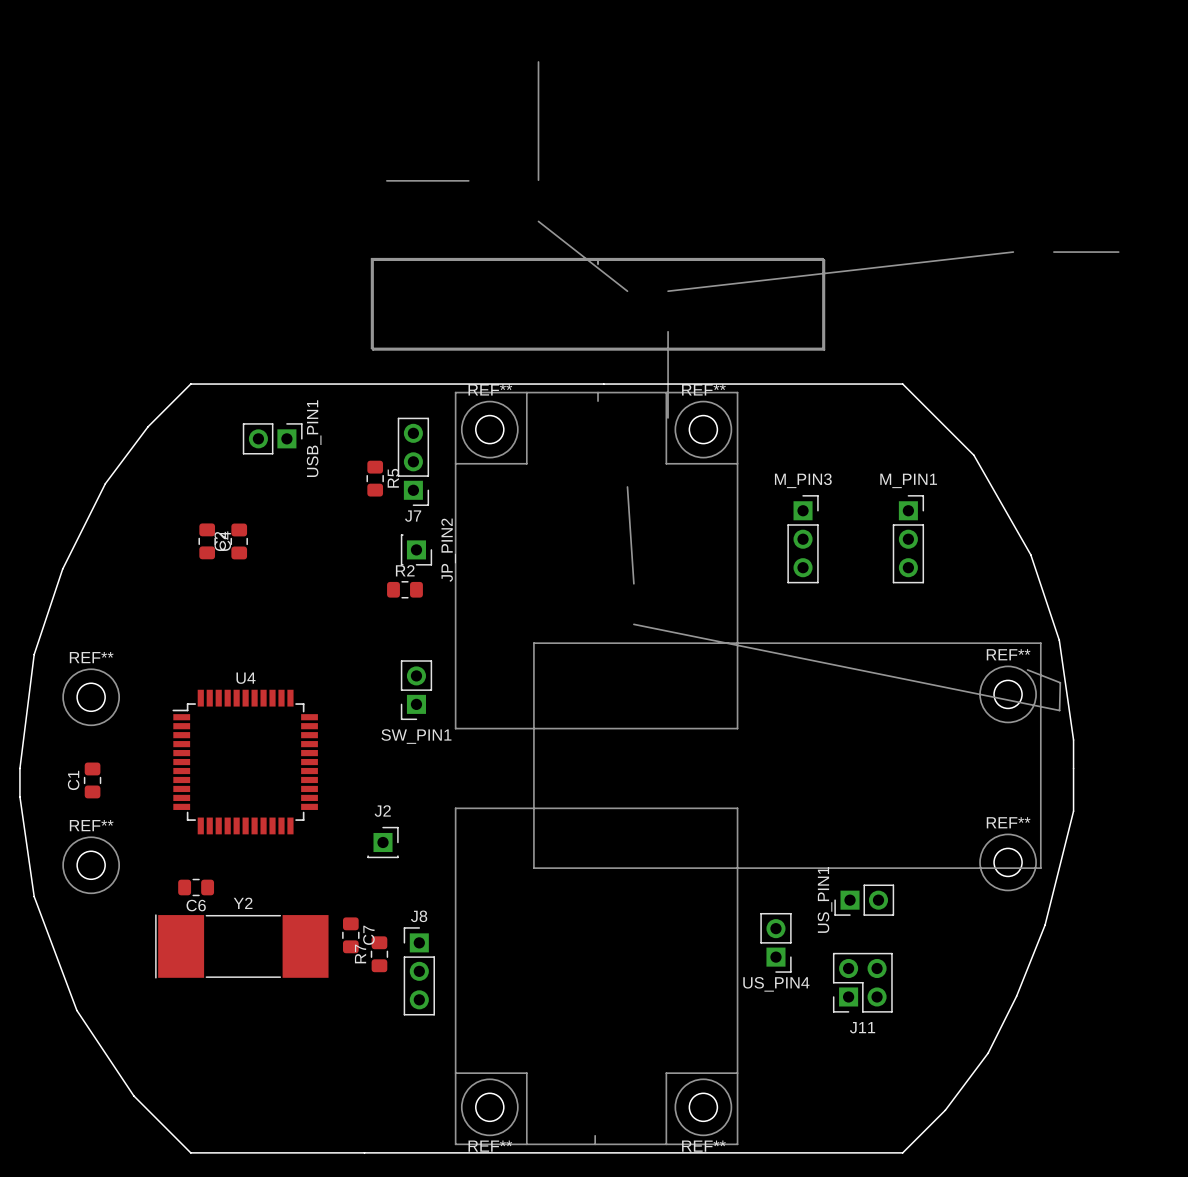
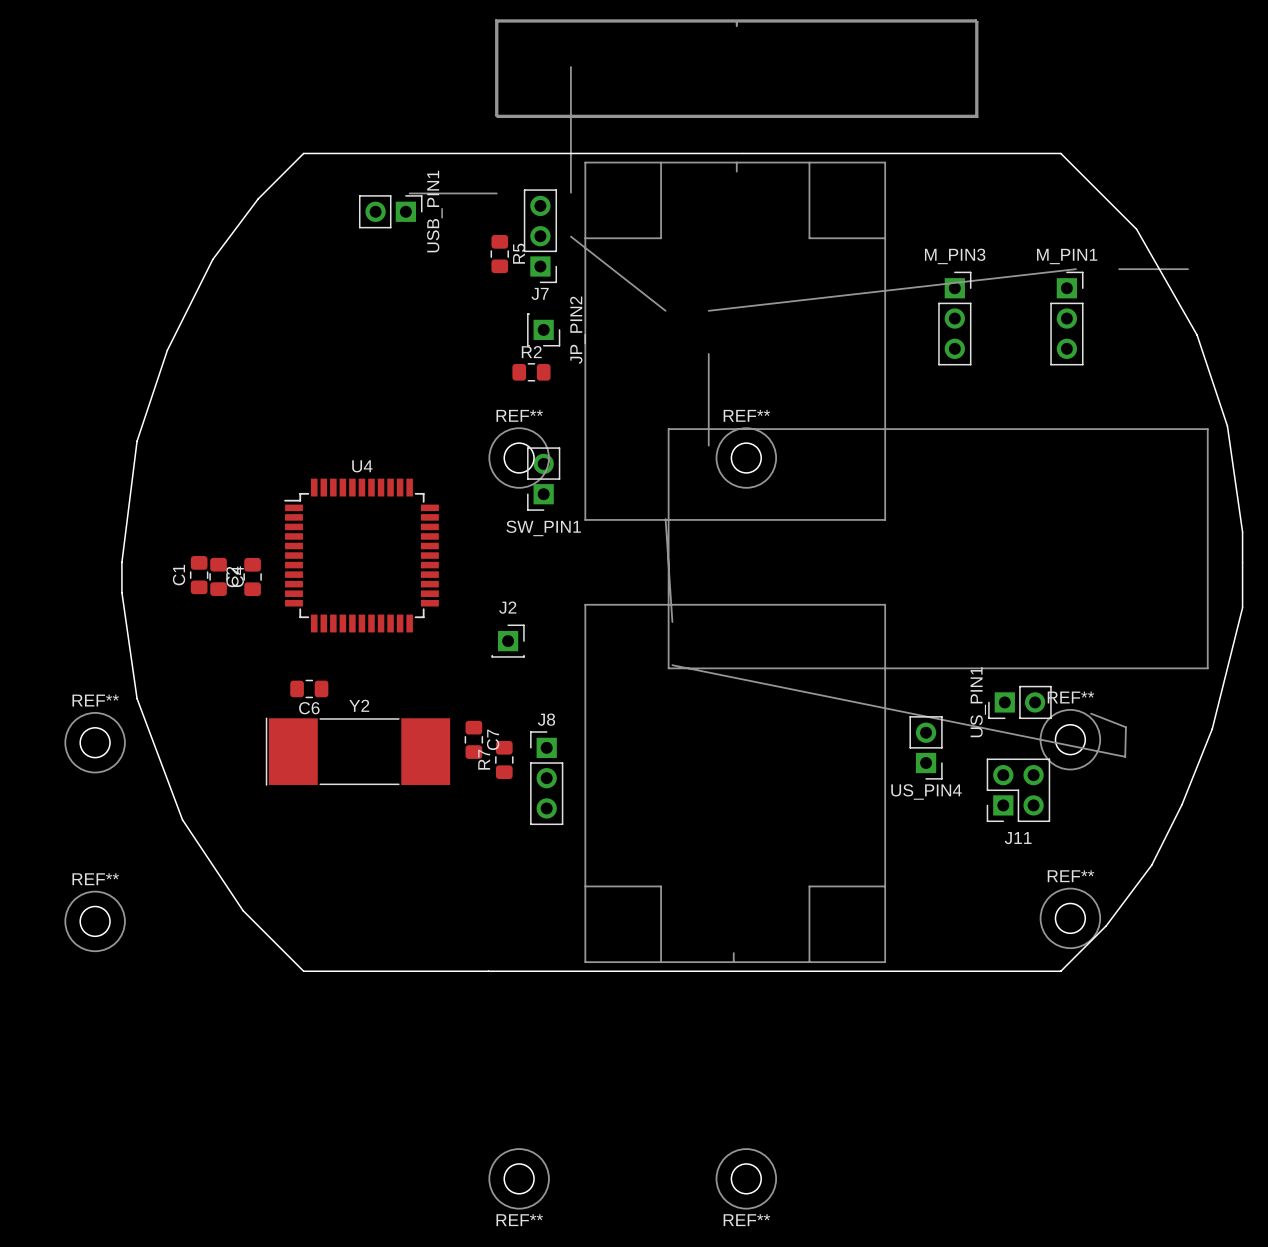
line: (371, 258) (371, 348) (822, 348) (822, 258) (371, 258) -> (495, 20) (495, 115) (976, 115) (976, 20) (495, 20)
line: (373, 260) (824, 260) (824, 349) (373, 349) (373, 260) -> (497, 21) (977, 21) (977, 117) (497, 117) (497, 21)
line: (598, 260) (598, 264) -> (736, 21) (736, 26)
board edge: (190, 384) (148, 426) (105, 483) (62, 569) (34, 654) (19, 768) (19, 796) (34, 896) (76, 1010) (133, 1095) (190, 1152) (902, 1152) (945, 1110) (988, 1053) (1016, 996) (1045, 925) (1073, 811) (1073, 739) (1059, 640) (1030, 554) (973, 455) (902, 384) (190, 384) -> (303, 153) (258, 198) (212, 259) (167, 350) (137, 441) (121, 562) (121, 592) (137, 698) (182, 819) (243, 910) (303, 971) (1060, 971) (1106, 925) (1151, 865) (1181, 804) (1212, 728) (1242, 607) (1242, 532) (1227, 426) (1197, 335) (1136, 229) (1060, 153) (303, 153)
line: (455, 392) (455, 728) (737, 728) (737, 392) (455, 392) -> (585, 162) (585, 519) (885, 519) (885, 162) (585, 162)
line: (526, 392) (526, 463) (455, 463) -> (661, 162) (661, 238) (585, 238)
line: (598, 392) (598, 401) -> (736, 162) (736, 171)
line: (666, 392) (666, 463) (737, 463) -> (809, 162) (809, 238) (885, 238)
USB_PIN1 position: (272, 438) -> (390, 211)
J7 position: (413, 461) -> (540, 236)
R5 position: (375, 478) -> (499, 254)
M_PIN3 position: (803, 539) -> (954, 318)
M_PIN1 position: (908, 539) -> (1066, 318)
JP_PIN2 position: (416, 549) -> (543, 329)
R2 position: (404, 589) -> (531, 372)
line: (533, 643) (1040, 643) (1040, 868) (533, 868) (533, 643) -> (668, 429) (1207, 429) (1207, 668) (668, 668) (668, 429)
SW_PIN1 position: (416, 690) -> (543, 479)
U4 position: (245, 762) -> (361, 555)
C1 position: (92, 780) -> (199, 575)
line: (455, 808) (455, 1144) (737, 1144) (737, 808) (455, 808) -> (585, 604) (585, 962) (885, 962) (885, 604) (585, 604)
J2 position: (383, 842) -> (508, 641)
C6 position: (196, 887) -> (309, 688)
US_PIN1 position: (864, 900) -> (1019, 702)
C7 position: (350, 935) -> (473, 739)
US_PIN4 position: (775, 942) -> (926, 747)
Y2 position: (241, 946) -> (357, 751)
R7 position: (379, 954) -> (504, 759)
J8 position: (419, 971) -> (546, 778)
J11 position: (862, 982) -> (1018, 790)
line: (455, 1073) (526, 1073) (526, 1144) -> (585, 886) (661, 886) (661, 962)
line: (737, 1073) (666, 1073) (666, 1144) -> (885, 886) (809, 886) (809, 962)
line: (595, 1135) (595, 1144) -> (733, 953) (733, 962)

